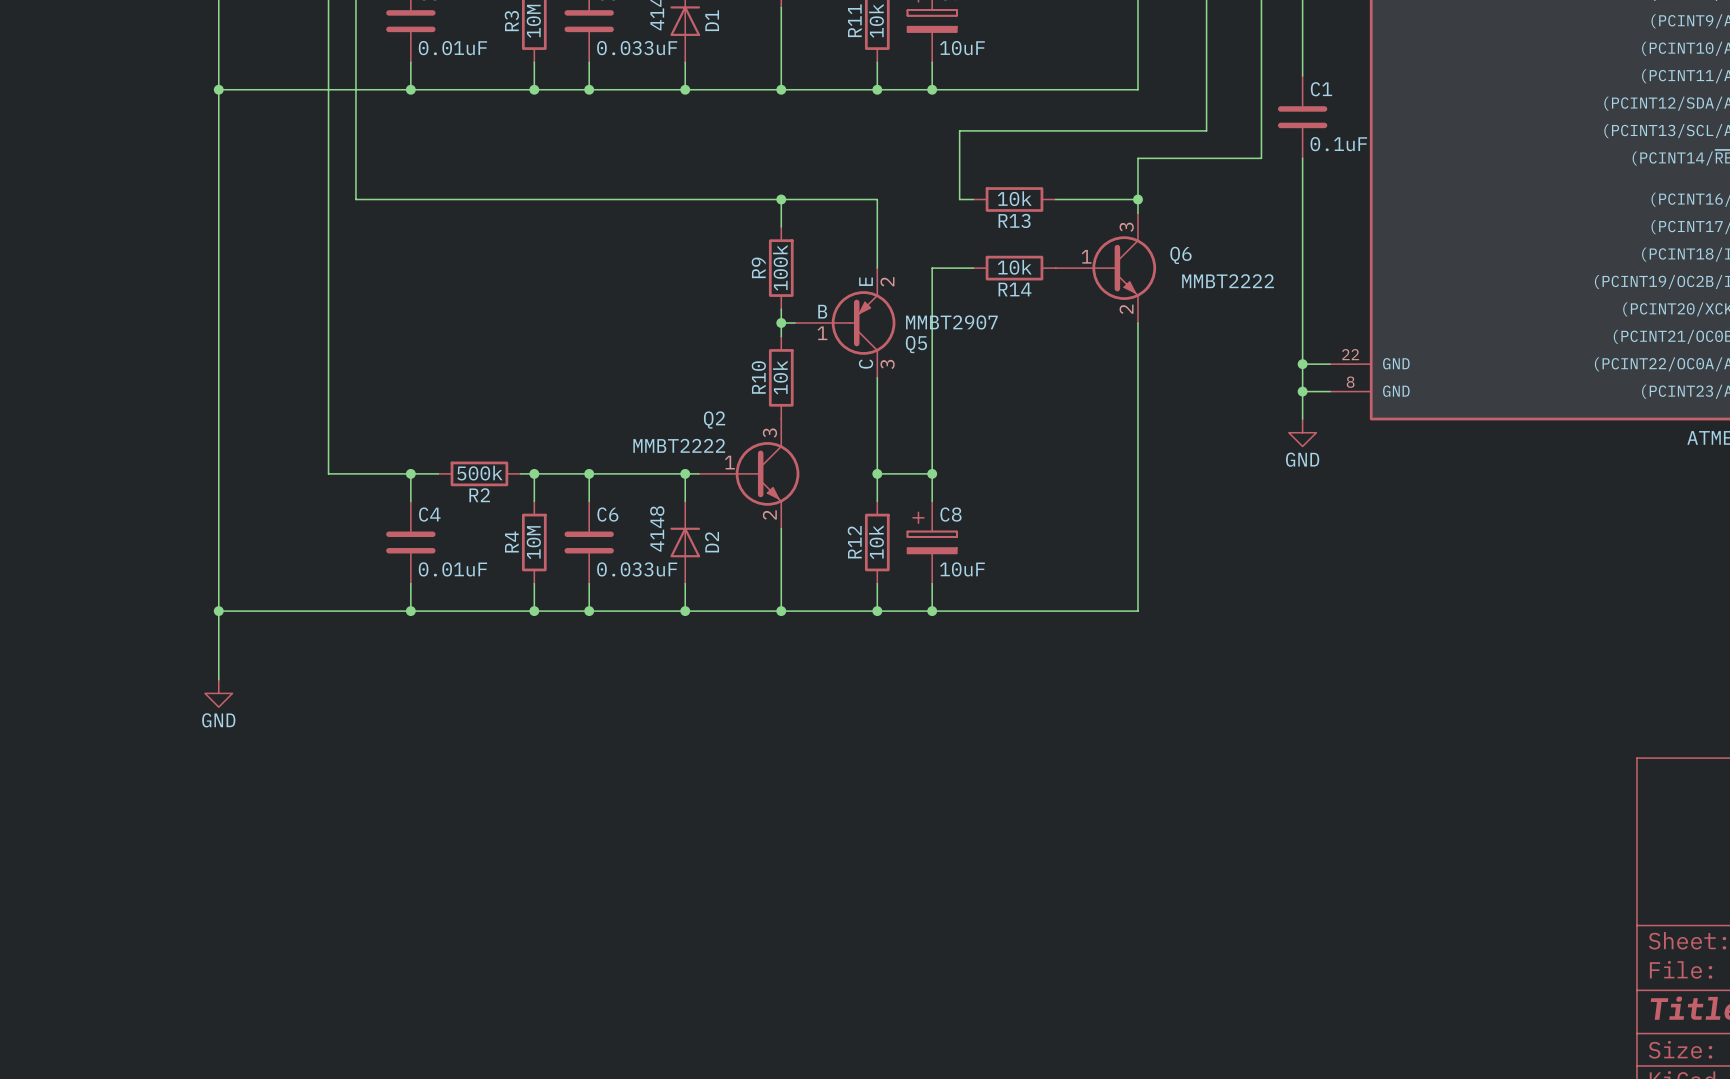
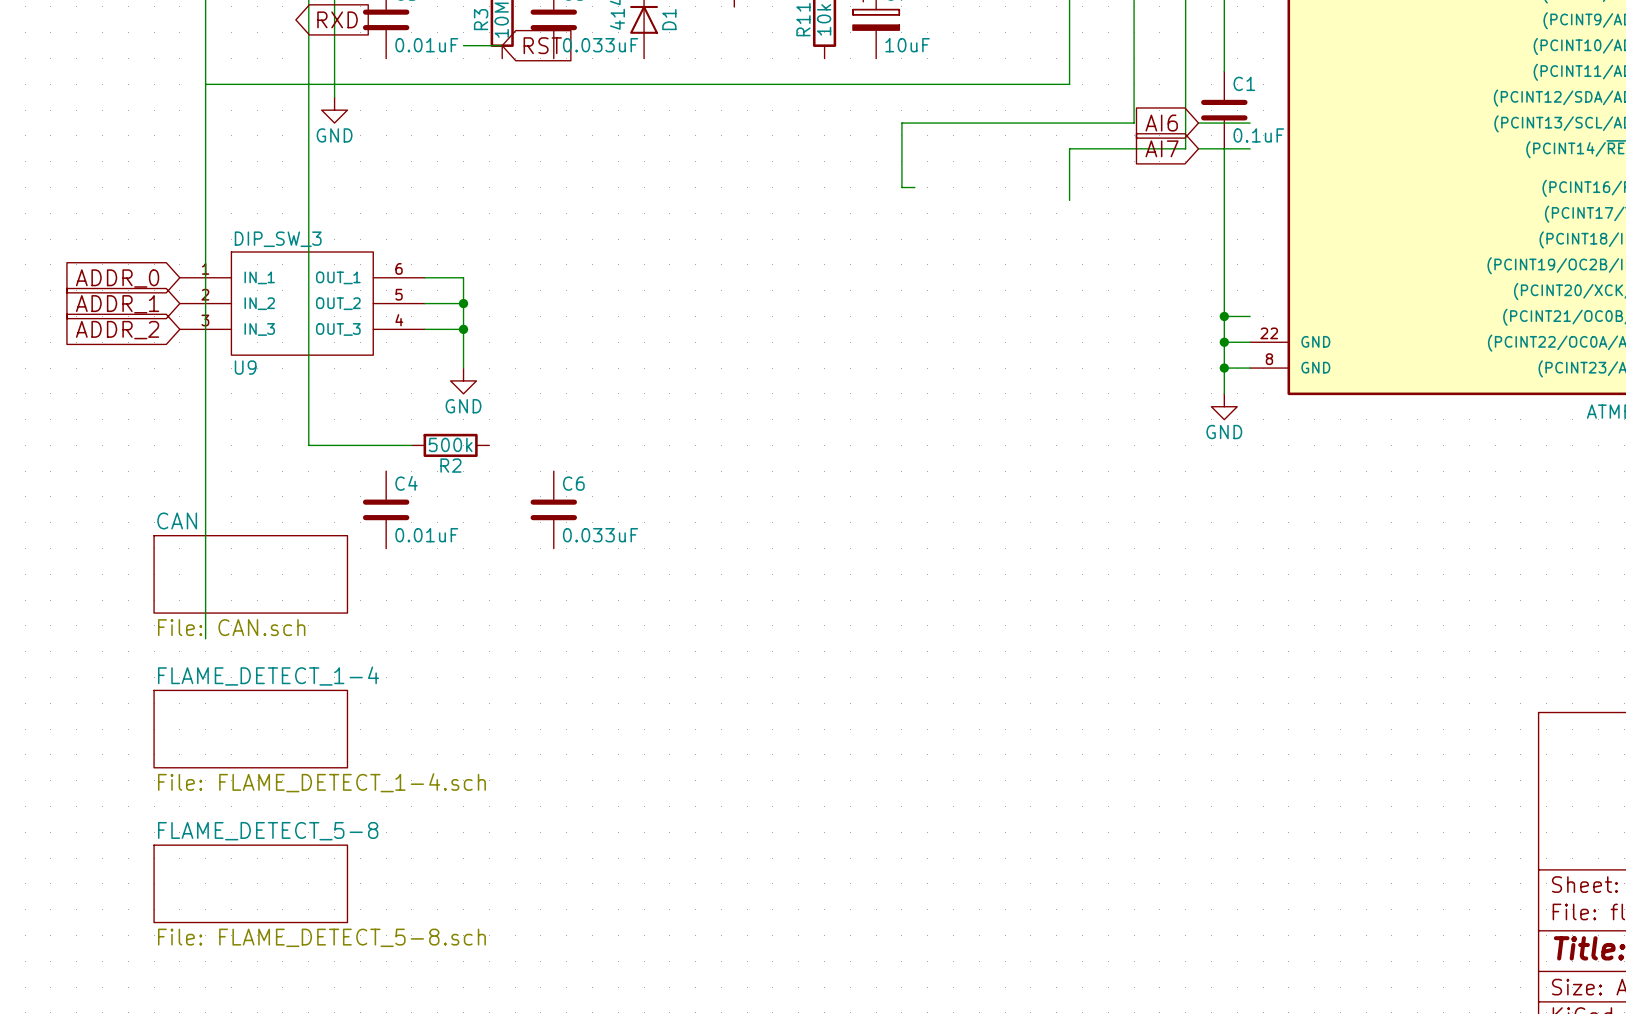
wire: (781, 7) (781, 89) -> none
global label: none -> RXD (337, 19)
wire: none -> (463, 45) (502, 45)
global label: none -> RST (542, 45)
wire: (410, 62) (410, 89) -> none
wire: (534, 62) (534, 89) -> none
wire: (589, 62) (589, 89) -> none
wire: (685, 62) (685, 89) -> none
wire: (877, 62) (877, 89) -> none
wire: (932, 62) (932, 89) -> none
junction: (218, 89) -> none
junction: (410, 89) -> none
junction: (534, 89) -> none
junction: (589, 89) -> none
junction: (685, 89) -> none
junction: (781, 89) -> none
junction: (877, 89) -> none
junction: (932, 89) -> none
wire: (355, 103) (355, 199) (877, 199) (877, 268) -> none
power symbol: none -> GND (334, 110)
wire: none -> (1198, 123) (1250, 123)
global label: none -> AI6 (1161, 123)
global label: none -> AI7 (1162, 148)
wire: none -> (1198, 148) (1250, 148)
wire: (781, 199) (781, 226) -> none
junction: (781, 199) -> none
R13: 10k (1014, 199) -> none
wire: (1055, 199) (1137, 199) -> none
junction: (1137, 199) -> none
R9: 100k (781, 268) -> none
wire: (973, 268) (932, 268) (932, 501) -> none
R14: 10k (1014, 268) -> none
Q6: MMBT2222 (1105, 268) -> none
wire: none -> (424, 277) (463, 277) (463, 368)
global label: none -> ADDR_0 (117, 278)
wire: (781, 309) (781, 336) -> none
U9: none -> DIP_SW_3 (302, 303)
wire: none -> (424, 303) (463, 303)
junction: none -> (463, 303)
wire: (781, 322) (794, 322) -> none
junction: (781, 322) -> none
Q5: MMBT2907 (845, 322) -> none
wire: (1137, 322) (1137, 611) (218, 611) -> none
global label: none -> ADDR_1 (117, 304)
wire: none -> (1224, 316) (1250, 316)
junction: none -> (1224, 316)
wire: none -> (424, 329) (463, 329)
junction: none -> (463, 329)
global label: none -> ADDR_2 (117, 330)
R10: 10k (781, 377) -> none
wire: (877, 377) (877, 501) -> none
power symbol: none -> GND (463, 380)
wire: (410, 473) (410, 501) -> none
junction: (410, 473) -> none
wire: (520, 473) (698, 473) -> none
wire: (534, 473) (534, 501) -> none
junction: (534, 473) -> none
wire: (589, 473) (589, 501) -> none
junction: (589, 473) -> none
wire: (685, 473) (685, 501) -> none
junction: (685, 473) -> none
Q2: MMBT2222 (749, 473) -> none
wire: (877, 473) (932, 473) -> none
junction: (877, 473) -> none
junction: (932, 473) -> none
wire: (781, 528) (781, 611) -> none
R4: 10M (534, 542) -> none
D2: 4148 (685, 542) -> none
R12: 10k (877, 542) -> none
C8: 10uF (932, 542) -> none
wire: (410, 583) (410, 611) -> none
wire: (534, 583) (534, 611) -> none
wire: (589, 583) (589, 611) -> none
wire: (685, 583) (685, 611) -> none
wire: (877, 583) (877, 611) -> none
wire: (932, 583) (932, 611) -> none
junction: (218, 611) -> none
sheet CAN: none -> File: CAN.sch (250, 574)
junction: (410, 611) -> none
junction: (534, 611) -> none
junction: (589, 611) -> none
junction: (685, 611) -> none
junction: (781, 611) -> none
junction: (877, 611) -> none
junction: (932, 611) -> none
power symbol: GND (218, 693) -> none
sheet FLAME_DETECT_1-4: none -> File: FLAME_DETECT_1-4.sch (250, 729)
sheet FLAME_DETECT_5-8: none -> File: FLAME_DETECT_5-8.sch (250, 883)

